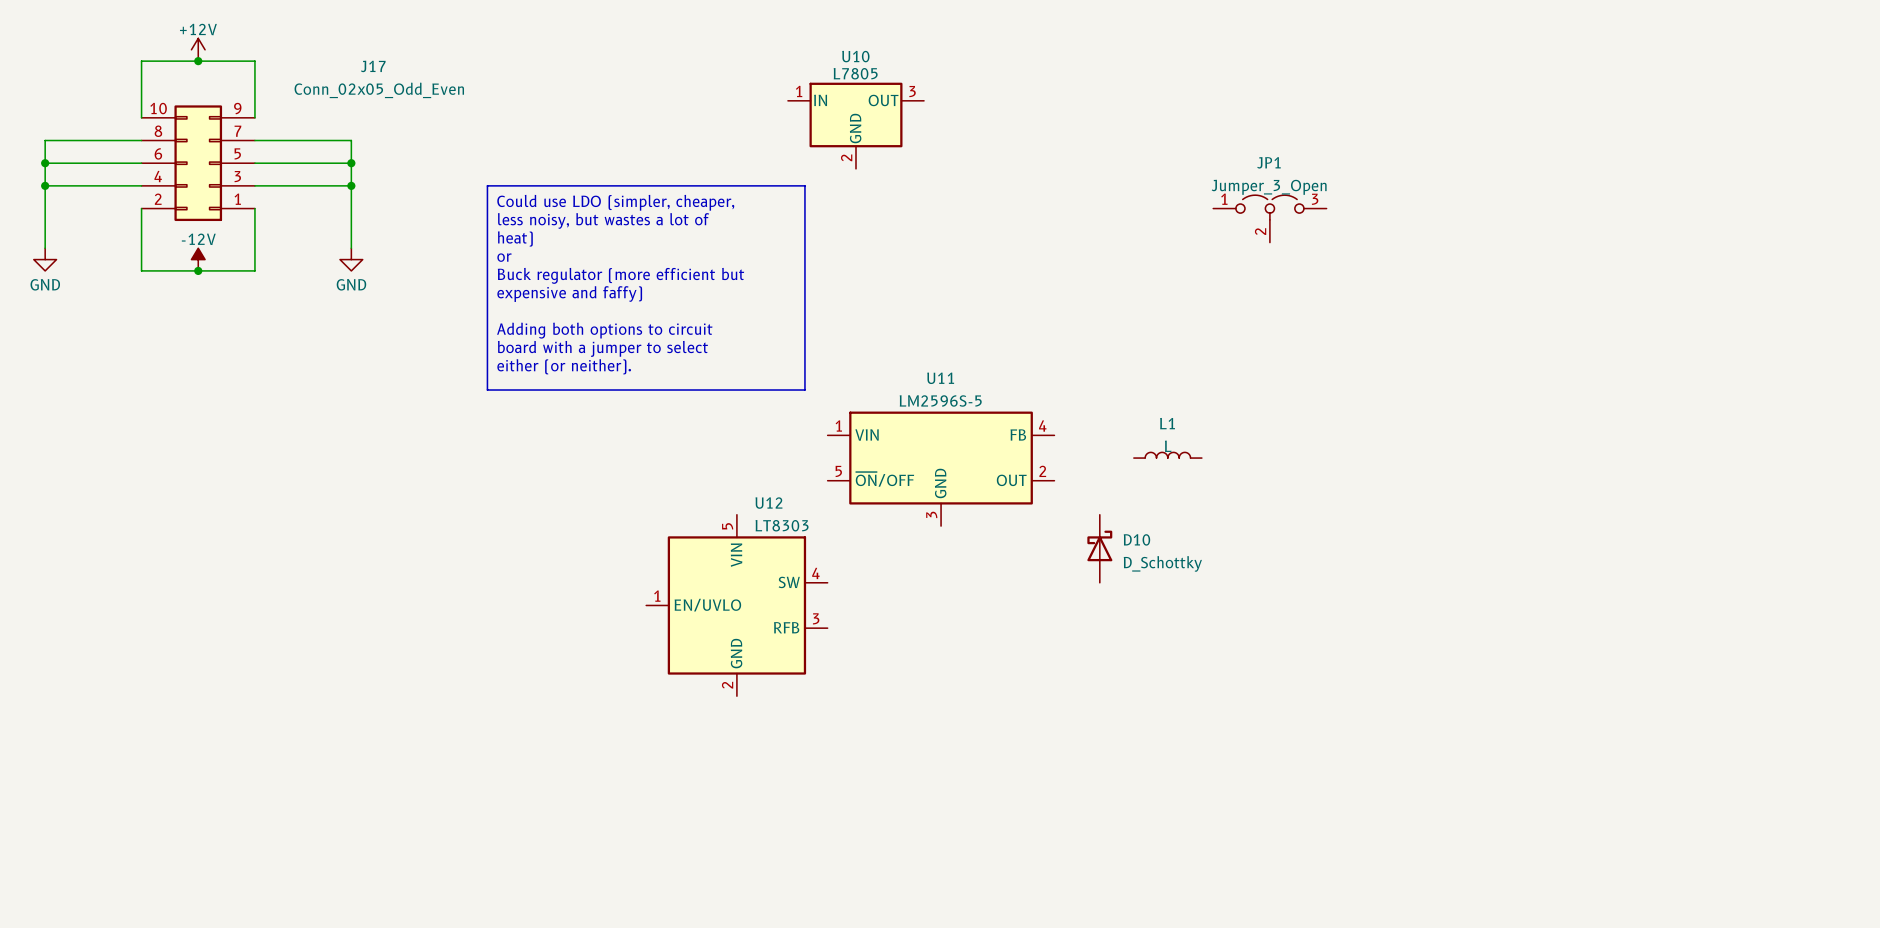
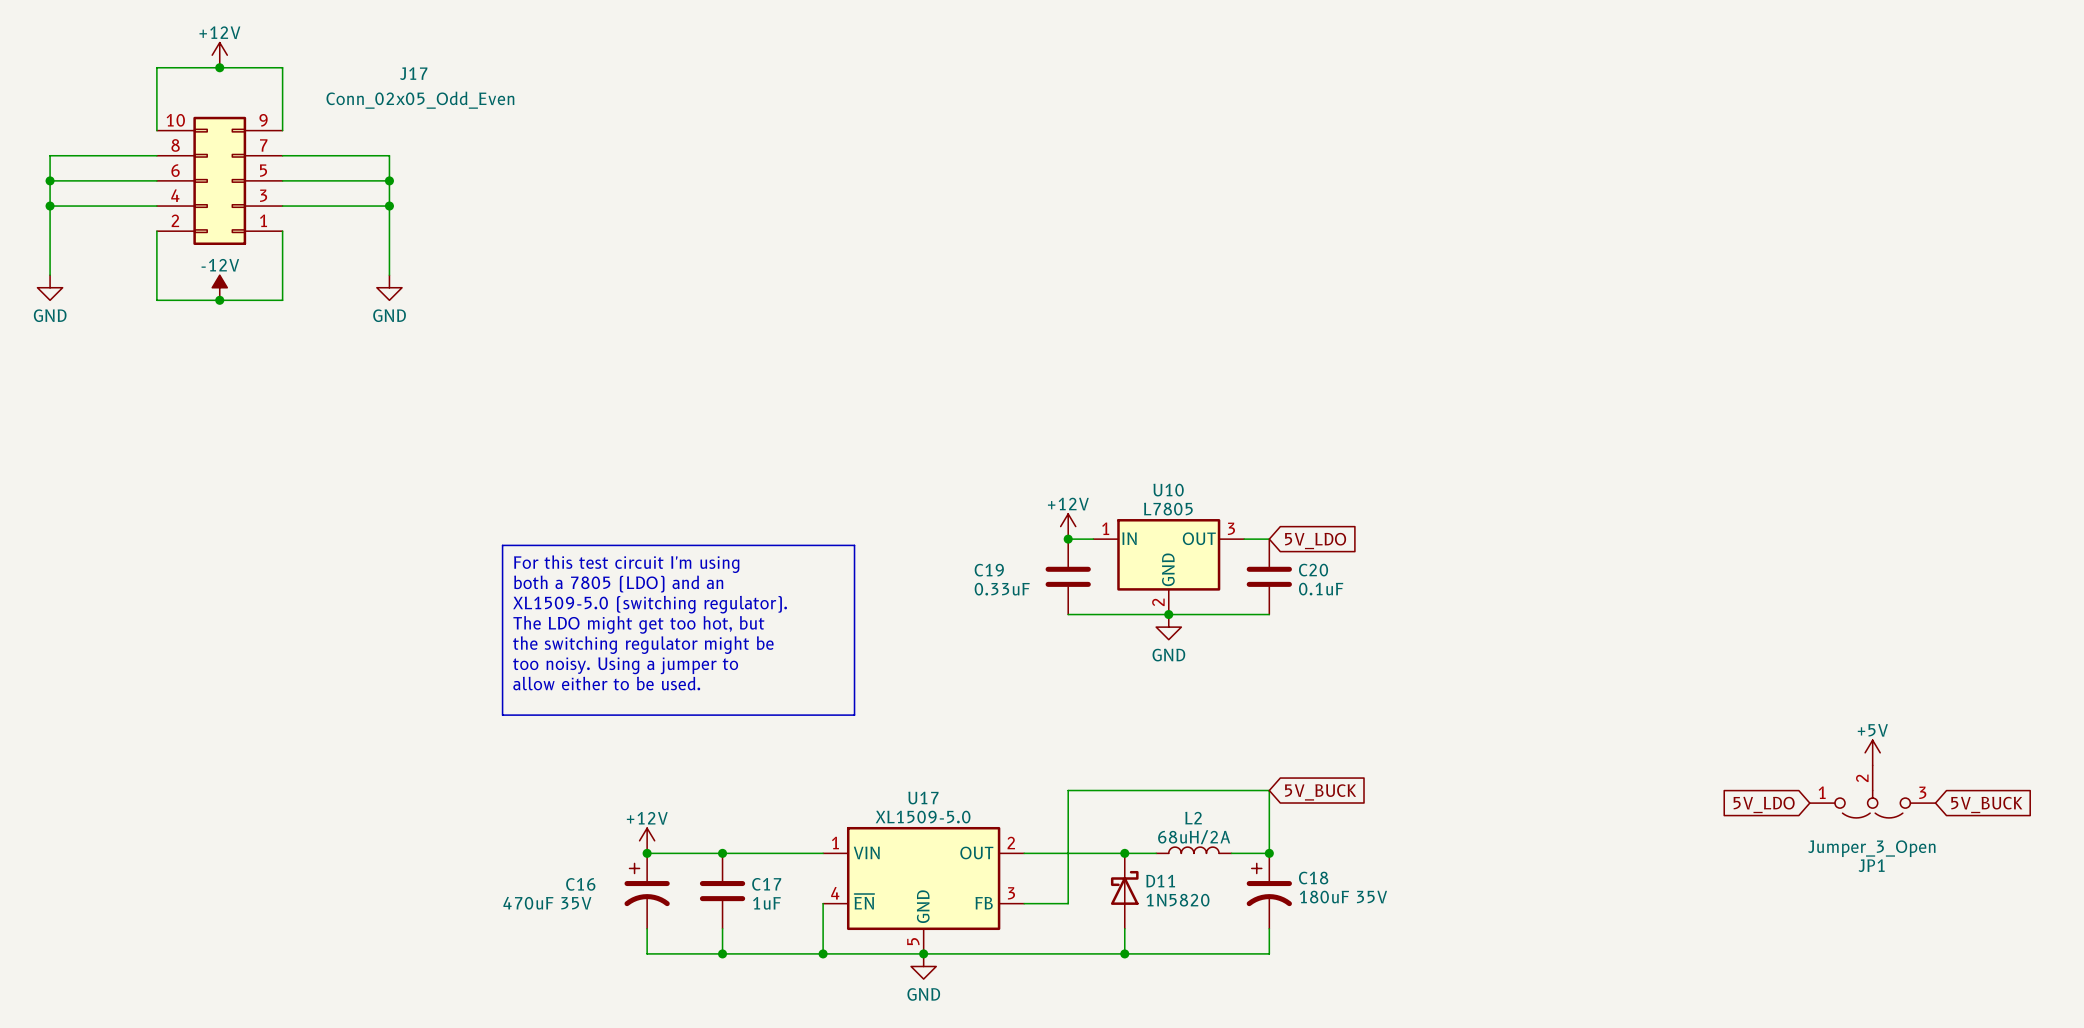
U10 position: (855, 125) -> (1168, 566)
line: (487, 185) (804, 185) (804, 390) (487, 390) (487, 185) -> none
text: Could use LDO (simpler, cheaper, (615, 202) -> none
JP1 flip: as is (1269, 207) -> up-down (1872, 804)
JP1 position: (1269, 218) -> (1872, 791)
text: less noisy, but wastes a lot of (603, 220) -> none
text: heat) (515, 238) -> none
text: or (504, 257) -> none
text: Buck regulator (more efficient but (620, 275) -> none
text: expensive and faffy) (569, 294) -> none
text: Adding both options to circuit (604, 330) -> none
text: board with a jumper to select (602, 348) -> none
text: either (or neither). (564, 366) -> none
L1: L (1167, 455) -> none
U11: LM2596S-5 (941, 468) -> none
power symbol: none -> +12V (1068, 526)
junction: none -> (1068, 539)
wire: none -> (1244, 539) (1269, 539)
global label: none -> 5V_LDO (1315, 541)
line: none -> (502, 545) (854, 545) (854, 715) (502, 715) (502, 545)
text: none -> For this test circuit I'm using (626, 564)
C19: none -> 0.33uF (1068, 576)
C20: none -> 0.1uF (1269, 576)
text: none -> both a 7805 (LDO) and an (618, 584)
text: none -> XL1509-5.0 (switching regulator). (650, 604)
D10: D_Schottky (1099, 548) -> none
wire: none -> (1068, 614) (1269, 614)
junction: none -> (1168, 614)
text: none -> The LDO might get too hot, but (638, 624)
power symbol: none -> GND (1168, 627)
text: none -> the switching regulator might be (643, 645)
text: none -> too noisy. Using a jumper to (625, 665)
U12: LT8303 (736, 605) -> none
text: none -> allow either to be used. (606, 683)
power symbol: none -> +5V (1872, 752)
global label: none -> 5V_BUCK (1320, 792)
global label: none -> 5V_LDO (1764, 804)
global label: none -> 5V_BUCK (1986, 804)
power symbol: none -> +12V (647, 840)
L2: none -> 68uH/2A (1193, 850)
wire: none -> (647, 853) (823, 853)
junction: none -> (647, 853)
junction: none -> (722, 853)
wire: none -> (1024, 853) (1156, 853)
junction: none -> (1124, 853)
wire: none -> (1231, 853) (1269, 853) (1269, 790) (1068, 790) (1068, 903) (1024, 903)
junction: none -> (1269, 853)
C16: none -> 470uF 35V (647, 891)
C17: none -> 1uF (722, 891)
U17: none -> XL1509-5.0 (923, 890)
D11: none -> 1N5820 (1124, 891)
C18: none -> 180uF 35V (1269, 891)
wire: none -> (823, 903) (823, 953)
wire: none -> (647, 928) (647, 953) (1269, 953) (1269, 928)
wire: none -> (722, 928) (722, 953)
wire: none -> (1124, 928) (1124, 953)
junction: none -> (722, 953)
junction: none -> (823, 953)
junction: none -> (923, 953)
junction: none -> (1124, 953)
power symbol: none -> GND (923, 966)

